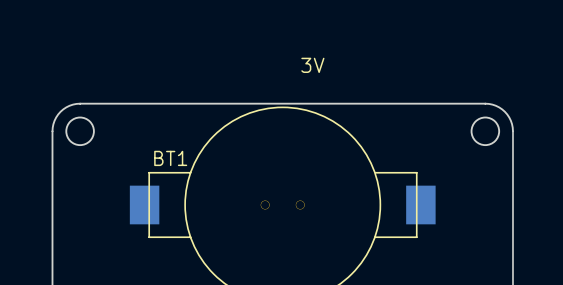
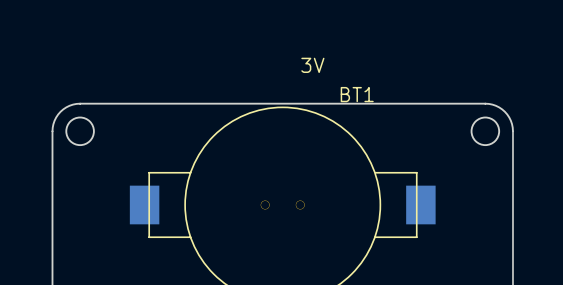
BT1 name position: BT1 (170, 158) -> BT1 (357, 94)

